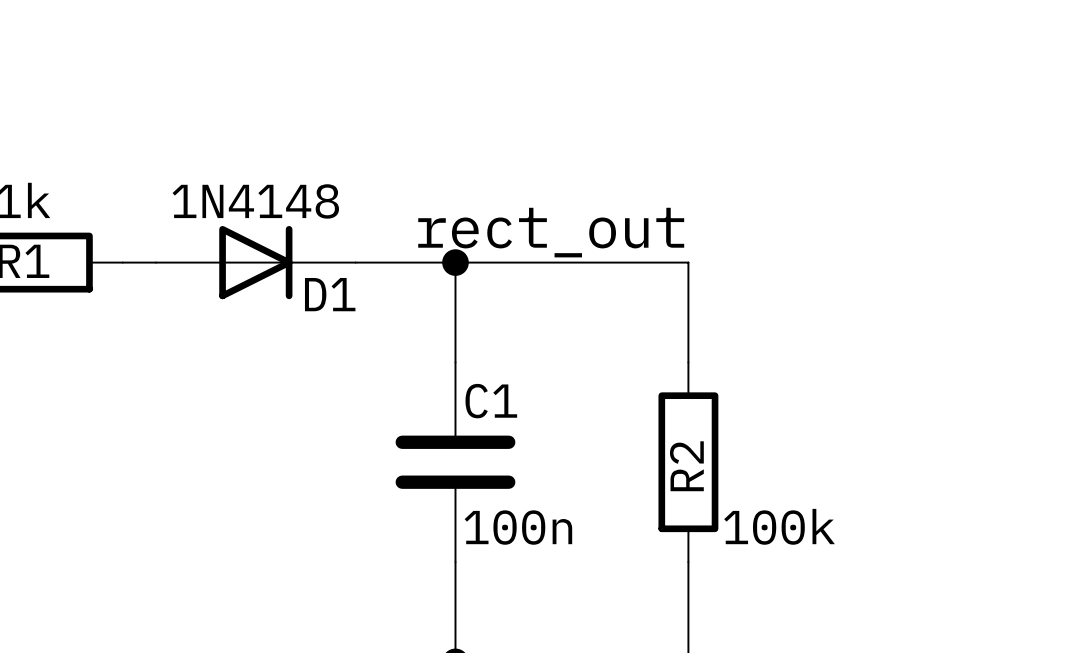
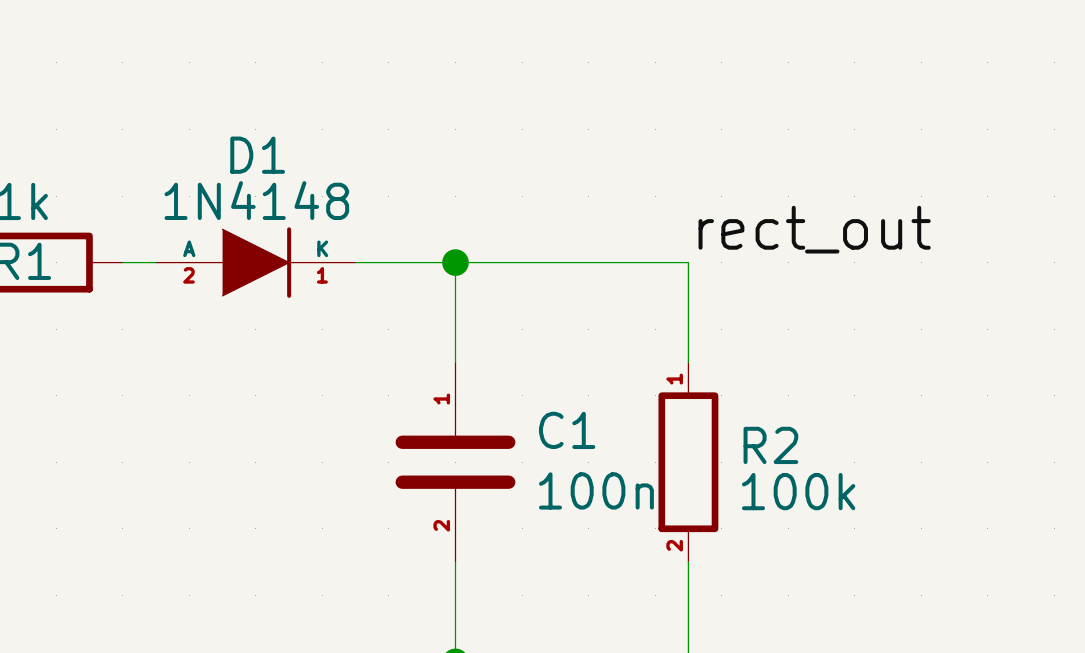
D1 symbol: [156, 225, 356, 300] -> [156, 227, 356, 298]
label position: rect_out (551, 232) -> rect_out (814, 229)
D1 name position: D1 (330, 294) -> D1 (257, 155)
R2 pin number: none -> 1 (674, 379)
C1 pin number: none -> 1 (441, 399)
C1 name position: C1 (491, 401) -> C1 (567, 430)
R2 name rotation: 0° (686, 466) -> 90° clockwise (770, 445)
R2 name position: R2 (686, 466) -> R2 (770, 445)
C1 pin number: none -> 2 (441, 525)
R2 value position: 100k (779, 526) -> 100k (798, 491)
C1 value position: 100n (518, 527) -> 100n (596, 490)
R2 pin number: none -> 2 (674, 545)

